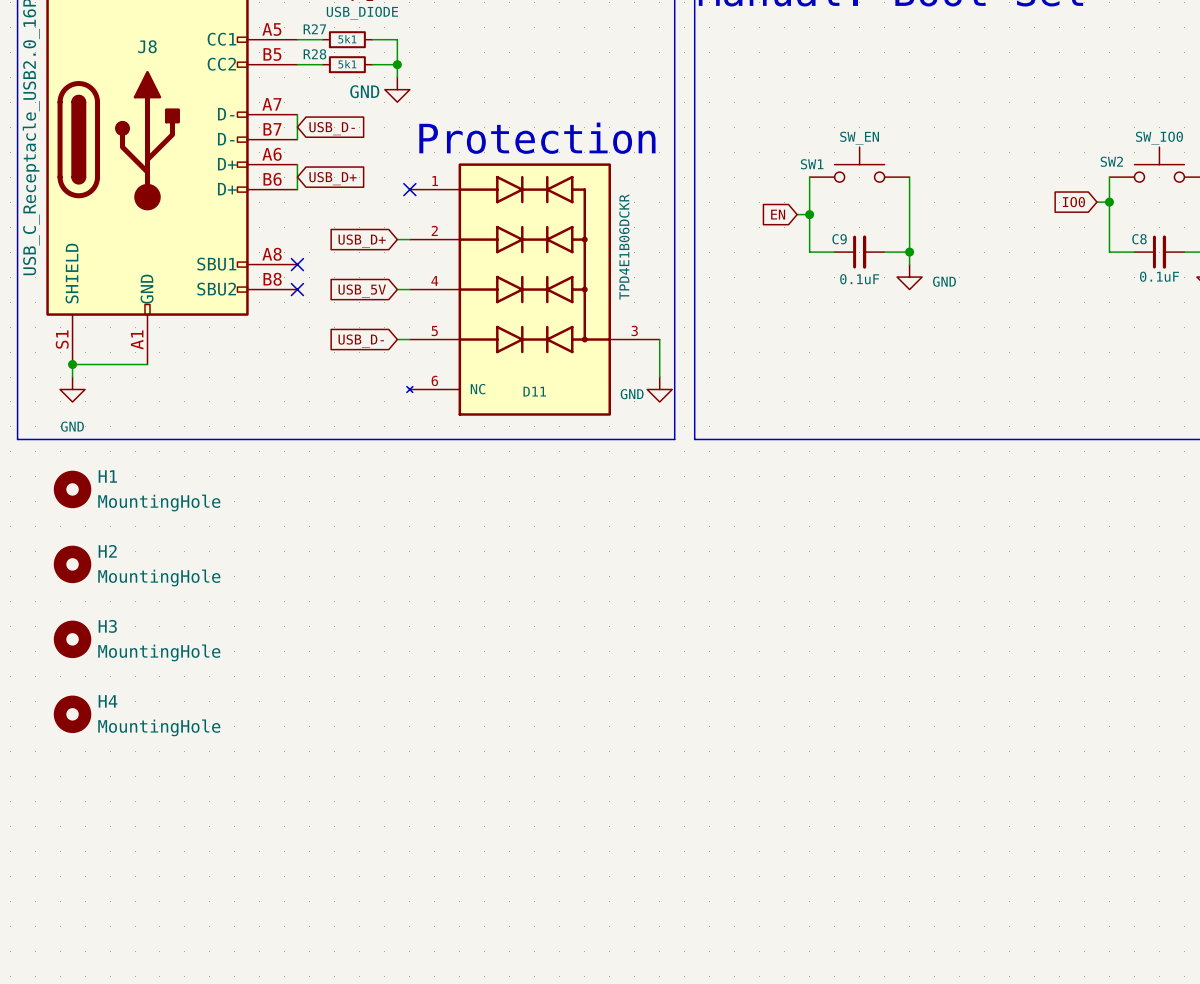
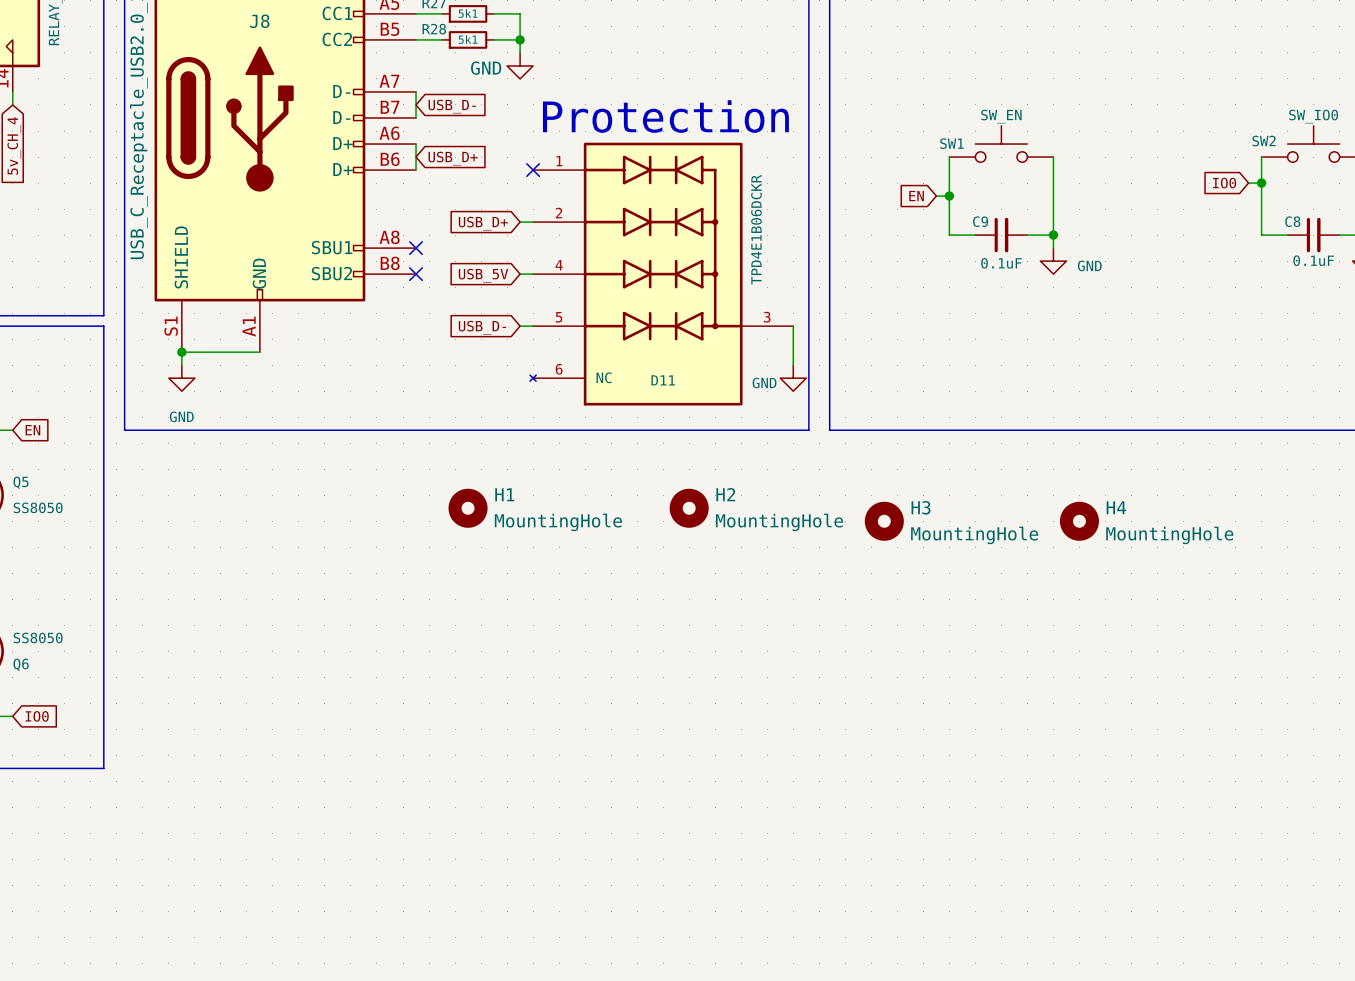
H1 position: (72, 489) -> (468, 508)
H2 position: (72, 564) -> (689, 508)
H3 position: (72, 639) -> (884, 521)
H4 position: (72, 714) -> (1079, 521)

